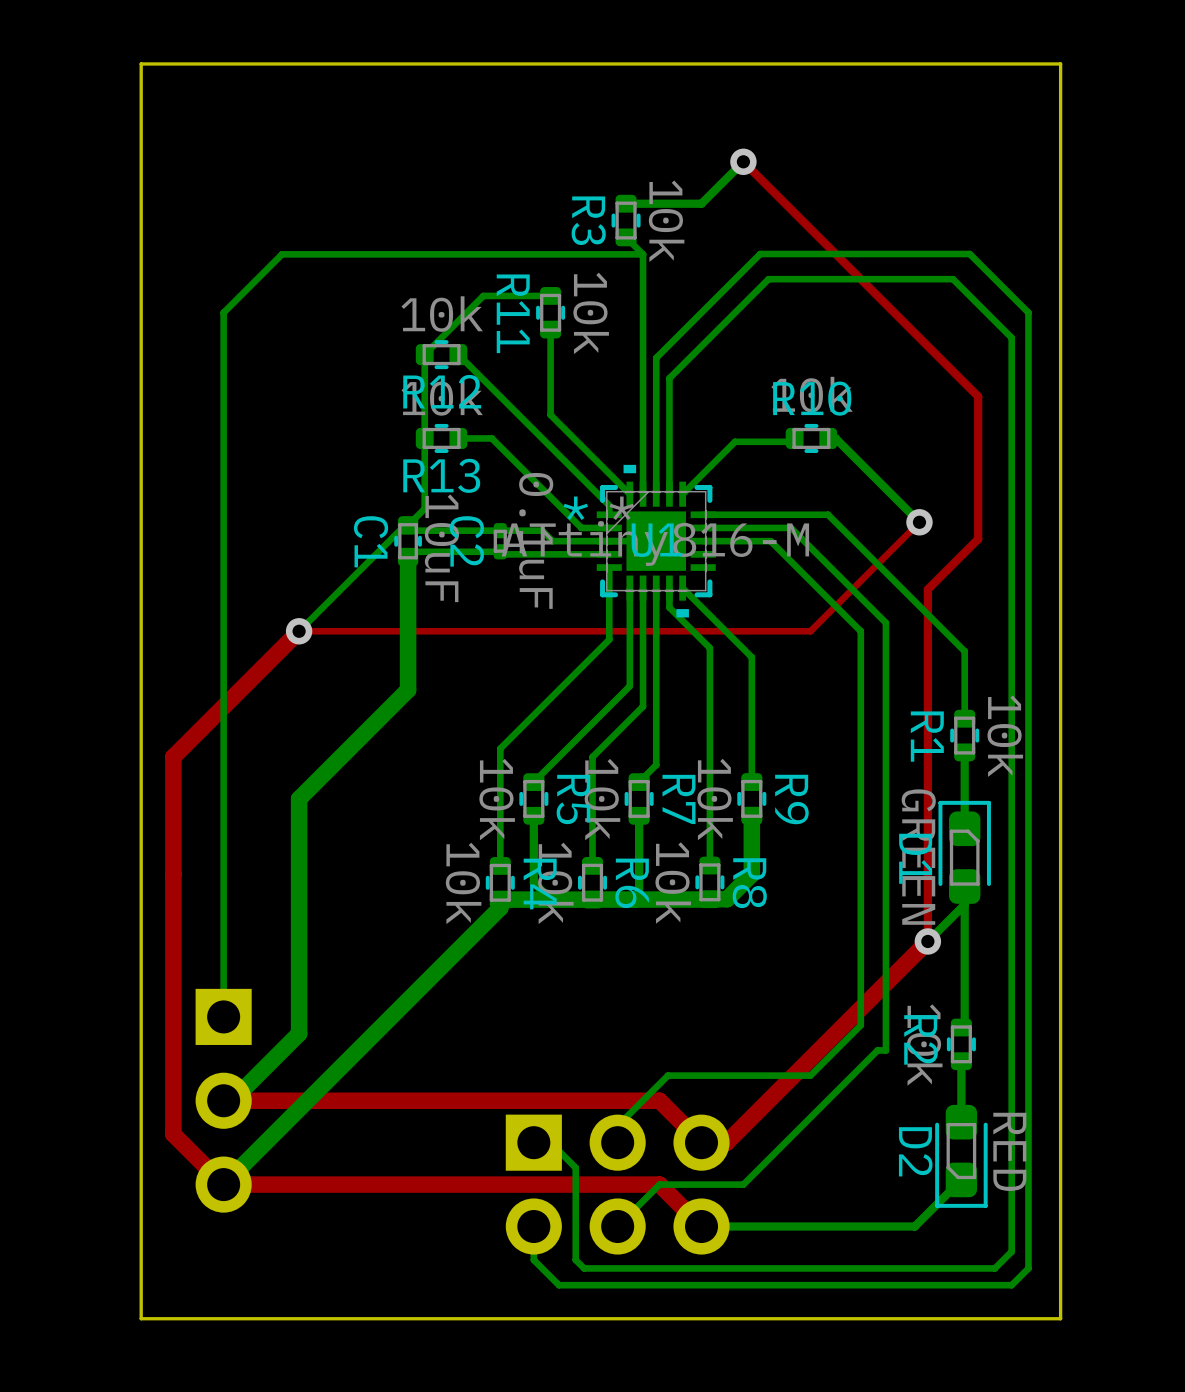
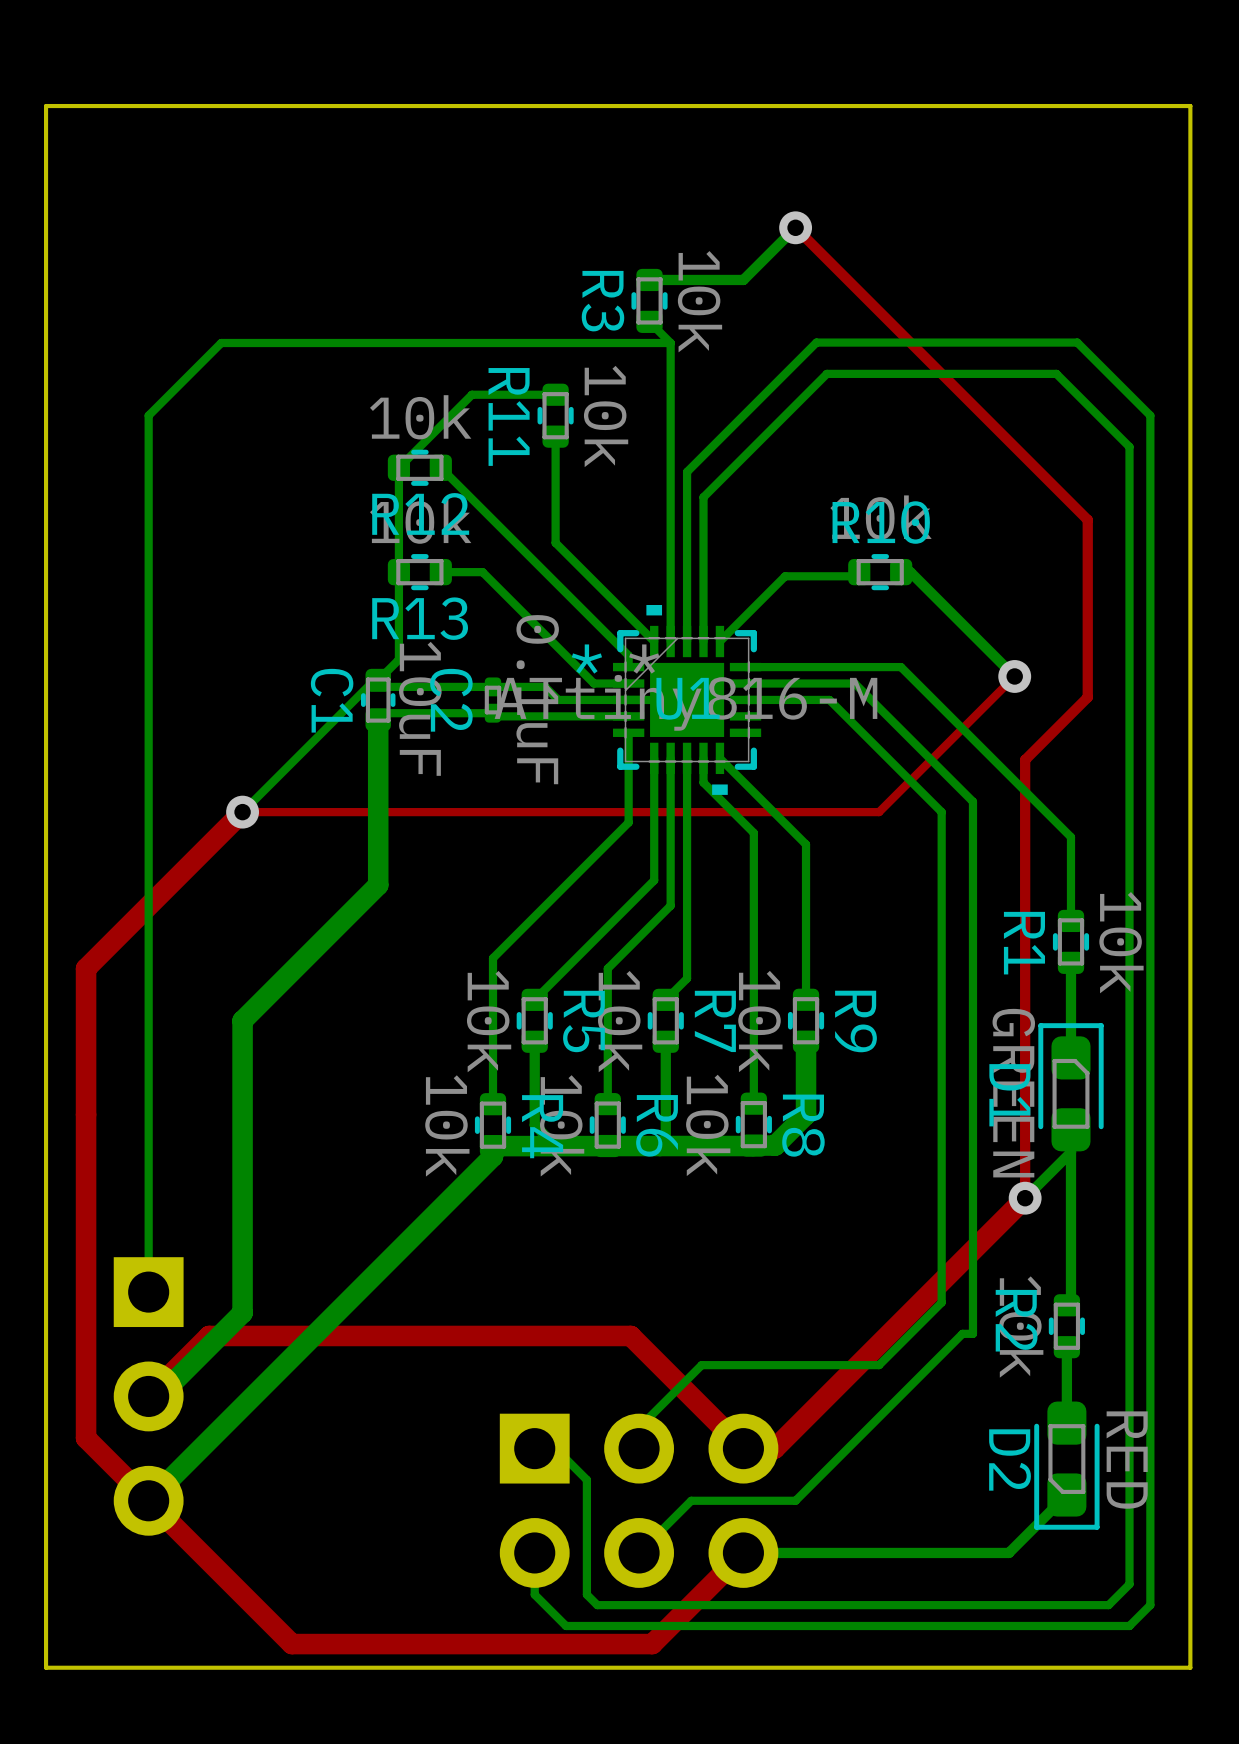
top track: (659, 1100) (223, 1100) -> (691, 1396) (630, 1335) (209, 1335) (148, 1396)
top track: (223, 1184) (659, 1184) (701, 1226) -> (148, 1500) (291, 1644) (652, 1644) (743, 1552)

